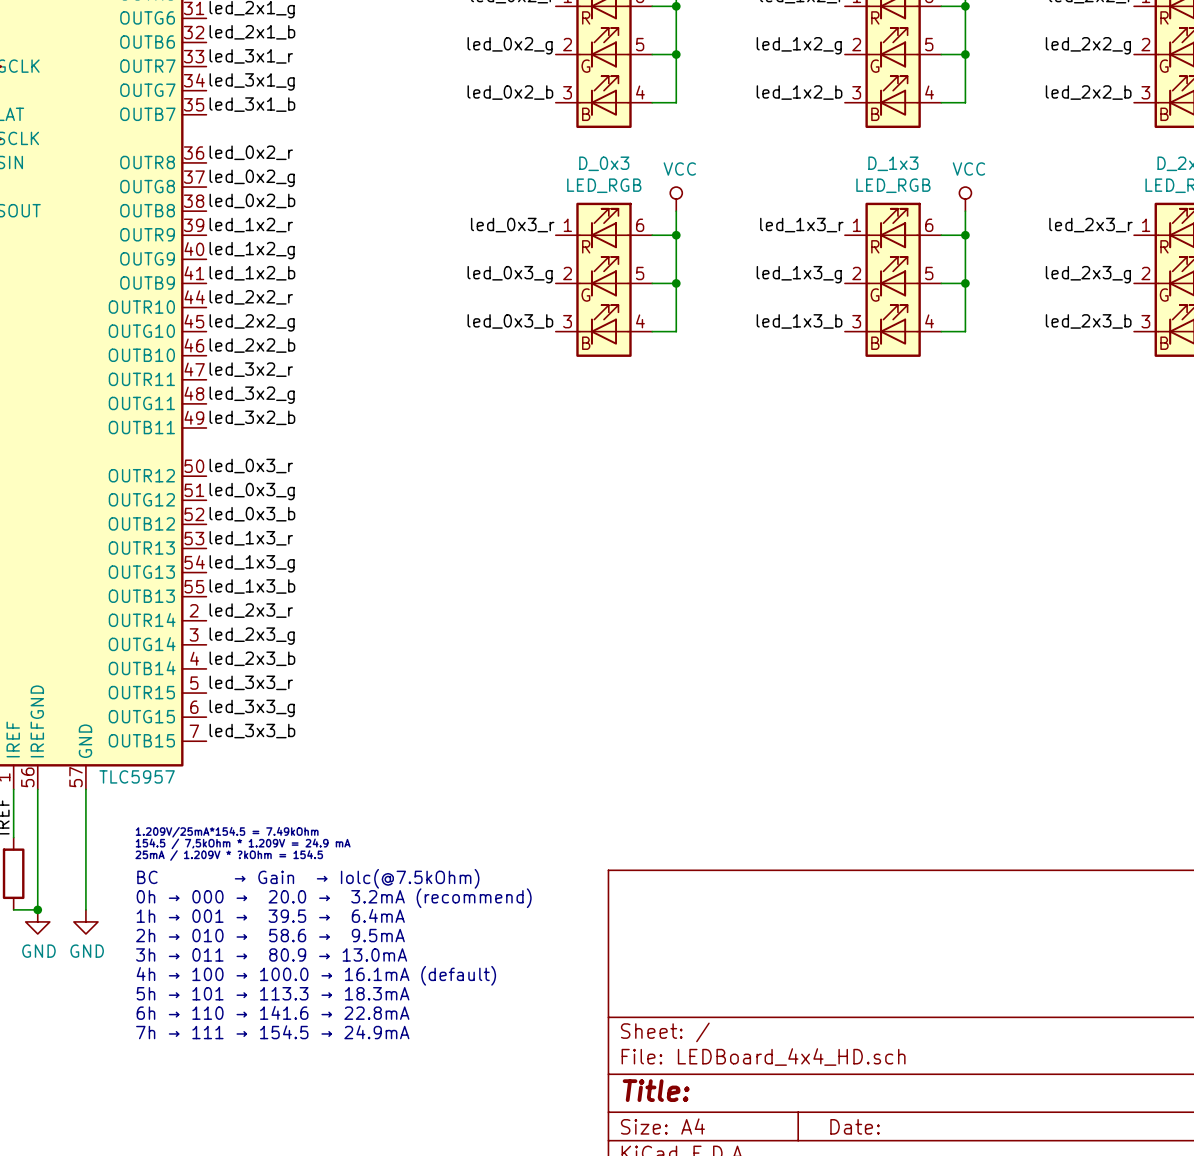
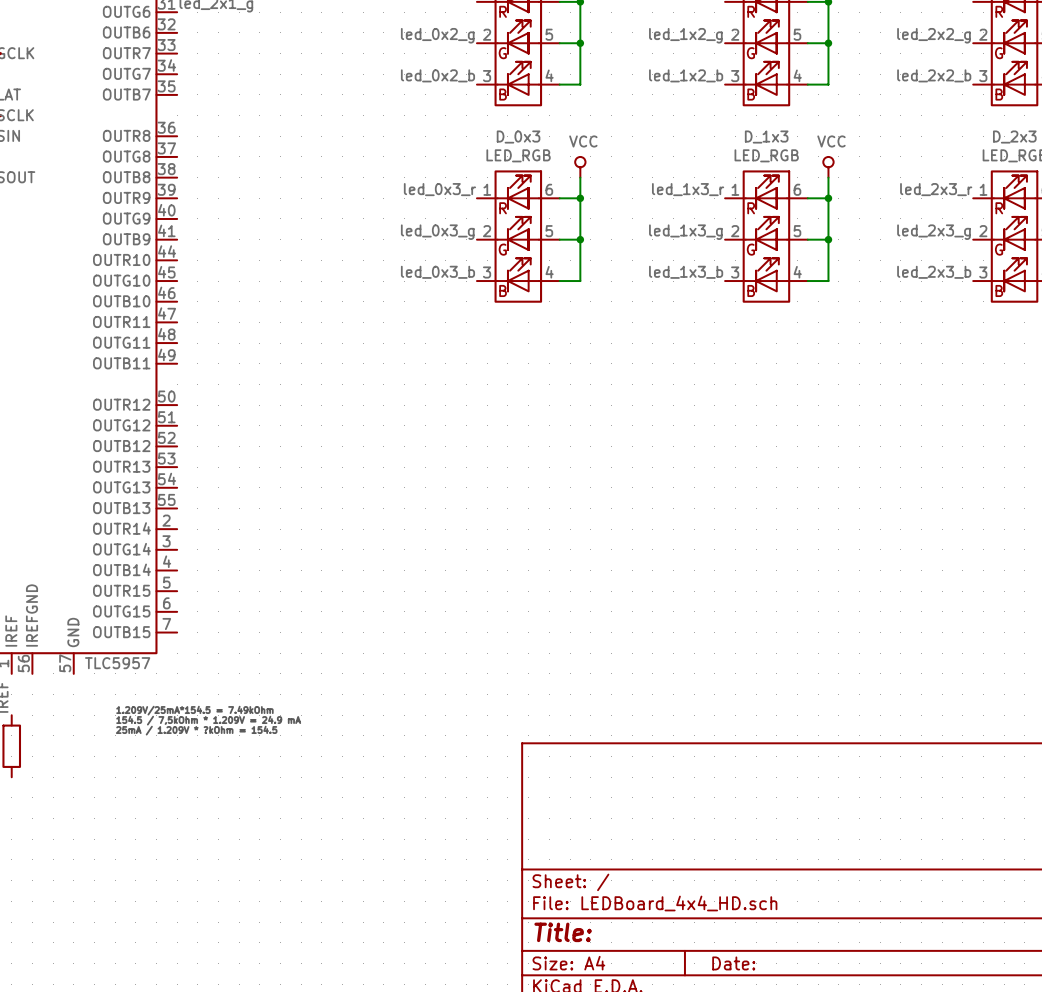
label: led_2x1_b (252, 32) -> none
label: led_3x1_r (251, 56) -> none
label: led_3x1_g (252, 81) -> none
label: led_3x1_b (252, 104) -> none
label: led_0x2_r (251, 152) -> none
label: led_0x2_g (252, 178) -> none
label: led_0x2_b (252, 200) -> none
label: led_1x2_r (251, 225) -> none
label: led_1x2_g (252, 250) -> none
label: led_1x2_b (252, 273) -> none
label: led_2x2_r (251, 297) -> none
label: led_2x2_g (252, 322) -> none
label: led_2x2_b (252, 345) -> none
label: led_3x2_r (251, 369) -> none
label: led_3x2_g (252, 395) -> none
label: led_3x2_b (252, 417) -> none
label: led_0x3_r (251, 466) -> none
label: led_0x3_g (252, 491) -> none
label: led_0x3_b (252, 514) -> none
label: led_1x3_r (251, 538) -> none
label: led_1x3_g (252, 563) -> none
label: led_1x3_b (252, 586) -> none
label: led_2x3_r (251, 610) -> none
label: led_2x3_g (252, 636) -> none
label: led_2x3_b (252, 658) -> none
label: led_3x3_r (251, 682) -> none
label: led_3x3_g (252, 708) -> none
label: led_3x3_b (252, 731) -> none
wire: (13, 789) (13, 837) -> none
wire: (37, 789) (37, 909) (13, 909) -> none
wire: (85, 789) (85, 909) -> none
text: BC → Gain → Iolc(@7.5kOhm) (308, 878) -> none
text: 0h → 000 → 20.0 → 3.2mA (recommend) (334, 898) -> none
junction: (37, 909) -> none
text: 1h → 001 → 39.5 → 6.4mA (270, 915) -> none
power symbol: GND (37, 921) -> none
power symbol: GND (85, 921) -> none
text: 2h → 010 → 58.6 → 9.5mA (270, 935) -> none
text: 3h → 011 → 80.9 → 13.0mA (271, 954) -> none
text: 4h → 100 → 100.0 → 16.1mA (default) (316, 975) -> none
text: 5h → 101 → 113.3 → 18.3mA (273, 993) -> none
text: 6h → 110 → 141.6 → 22.8mA (273, 1012) -> none
text: 7h → 111 → 154.5 → 24.9mA (272, 1032) -> none

